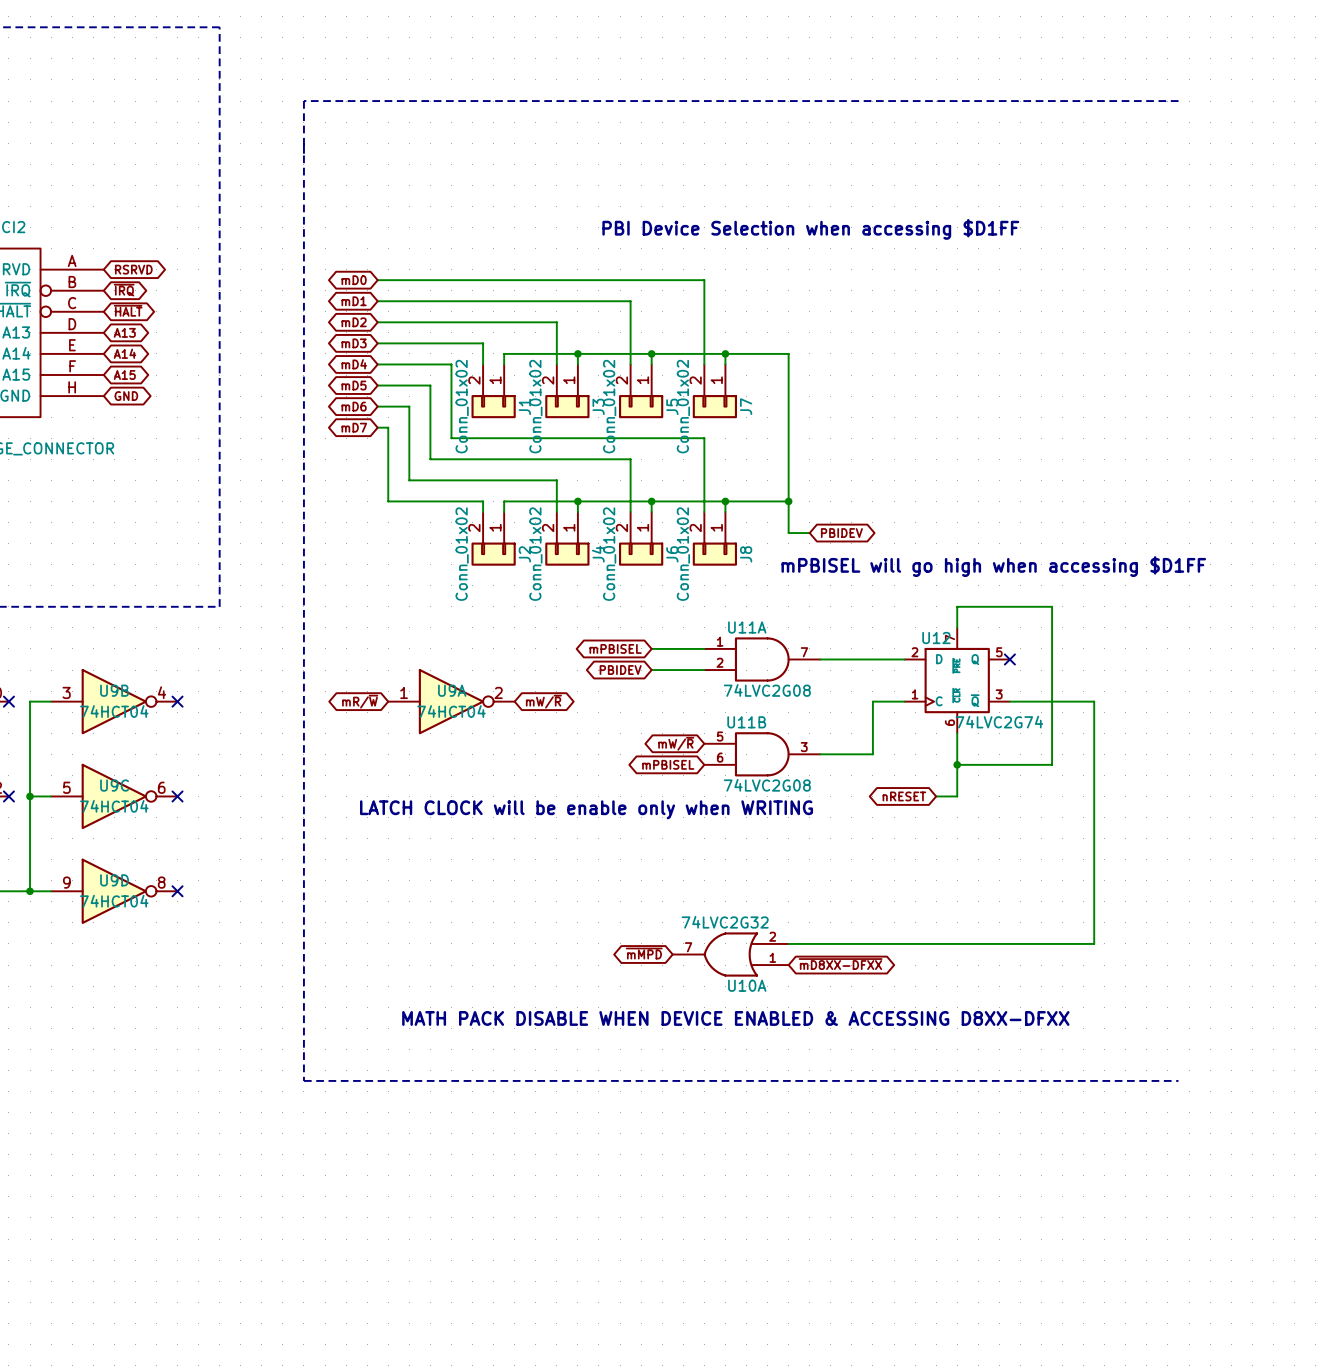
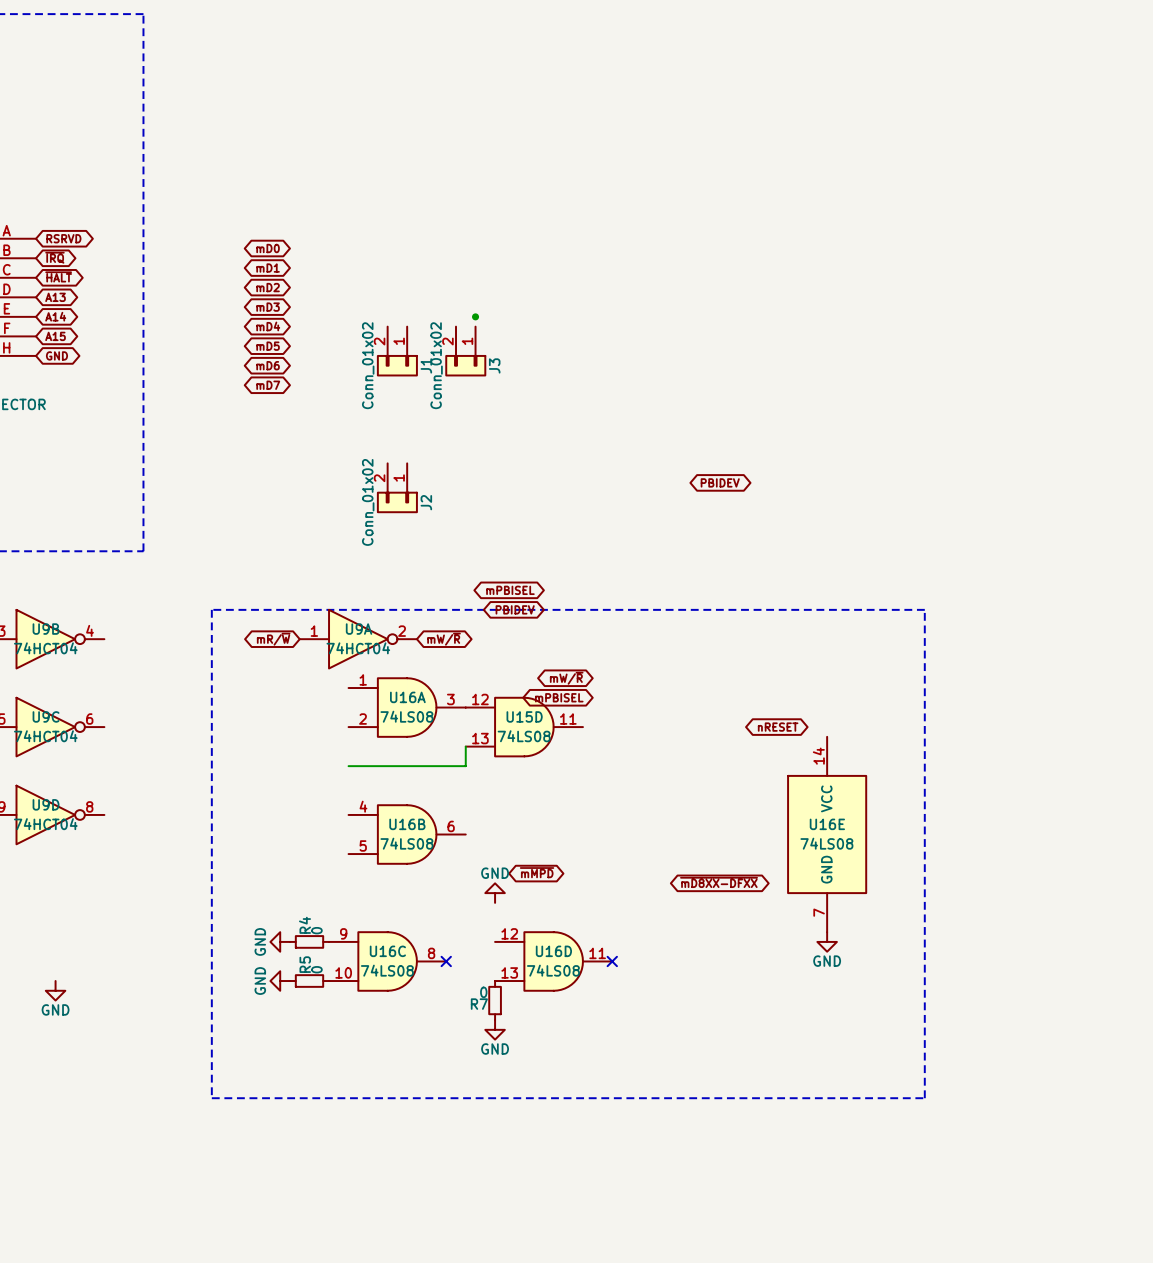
line: (1178, 101) (303, 101) (303, 1080) (1178, 1080) -> none
text: PBI Device Selection when accessing $D1FF (810, 229) -> none
wire: (377, 280) (704, 280) (704, 364) -> none
wire: (377, 301) (630, 301) (630, 364) -> none
wire: (377, 322) (556, 322) (556, 364) -> none
wire: (377, 343) (483, 343) (483, 364) -> none
wire: (577, 353) (577, 364) -> none
wire: (651, 353) (651, 364) -> none
junction: (651, 353) -> none
wire: (725, 353) (725, 364) -> none
junction: (725, 353) -> none
wire: (377, 364) (451, 364) (451, 438) (704, 438) (704, 511) -> none
wire: (504, 364) (504, 353) (788, 353) (788, 533) (809, 533) -> none
wire: (377, 385) (430, 385) (430, 459) (630, 459) (630, 511) -> none
J5: Conn_01x02 (641, 391) -> none
J7: Conn_01x02 (714, 391) -> none
wire: (377, 406) (409, 406) (409, 480) (556, 480) (556, 511) -> none
wire: (377, 427) (388, 427) (388, 501) (483, 501) (483, 511) -> none
wire: (577, 501) (577, 511) -> none
junction: (577, 501) -> none
wire: (651, 501) (651, 511) -> none
junction: (651, 501) -> none
wire: (725, 501) (725, 511) -> none
junction: (725, 501) -> none
wire: (788, 501) (504, 501) (504, 511) -> none
junction: (788, 501) -> none
J4: Conn_01x02 (567, 538) -> none
J6: Conn_01x02 (641, 538) -> none
J8: Conn_01x02 (714, 538) -> none
text: mPBISEL will go high when accessing $D1FF (993, 566) -> none
wire: (957, 627) (957, 606) (1052, 606) (1052, 764) (957, 764) -> none
wire: (651, 648) (704, 648) -> none
U11A: 74LVC2G08 (762, 659) -> none
wire: (820, 659) (904, 659) -> none
no-connect mark: (1009, 659) -> none
line: none -> (211, 609) (211, 1098) (924, 1098) (924, 609) (211, 609)
U12: 74LVC2G74 (957, 680) -> none
no-connect mark: (177, 701) -> none
wire: (904, 701) (872, 701) (872, 754) (820, 754) -> none
wire: (1009, 701) (1094, 701) (1094, 943) (788, 943) -> none
wire: (957, 733) (957, 796) (936, 796) -> none
U11B: 74LVC2G08 (762, 754) -> none
junction: (957, 764) -> none
U16A: none -> 74LS08 (407, 707)
no-connect mark: (177, 796) -> none
U15D: none -> 74LS08 (524, 727)
text: LATCH CLOCK will be enable only when WRITING (586, 809) -> none
wire: none -> (465, 746) (465, 766) (348, 766)
no-connect mark: (177, 891) -> none
U16B: none -> 74LS08 (407, 834)
U16E: none -> 74LS08 (827, 834)
U10A: 74LVC2G32 (730, 954) -> none
power symbol: none -> GND (495, 893)
text: MATH PACK DISABLE WHEN DEVICE ENABLED & ACCESSING D8XX-DFXX (735, 1018) -> none
power symbol: none -> GND (280, 941)
R4: none -> 0 (309, 941)
power symbol: none -> GND (827, 941)
U16C: none -> 74LS08 (387, 961)
no-connect mark: none -> (446, 961)
U16D: none -> 74LS08 (553, 961)
no-connect mark: none -> (612, 961)
power symbol: none -> GND (280, 981)
R5: none -> 0 (309, 981)
power symbol: none -> GND (55, 990)
R7: none -> 0 (495, 1000)
power symbol: none -> GND (495, 1029)

